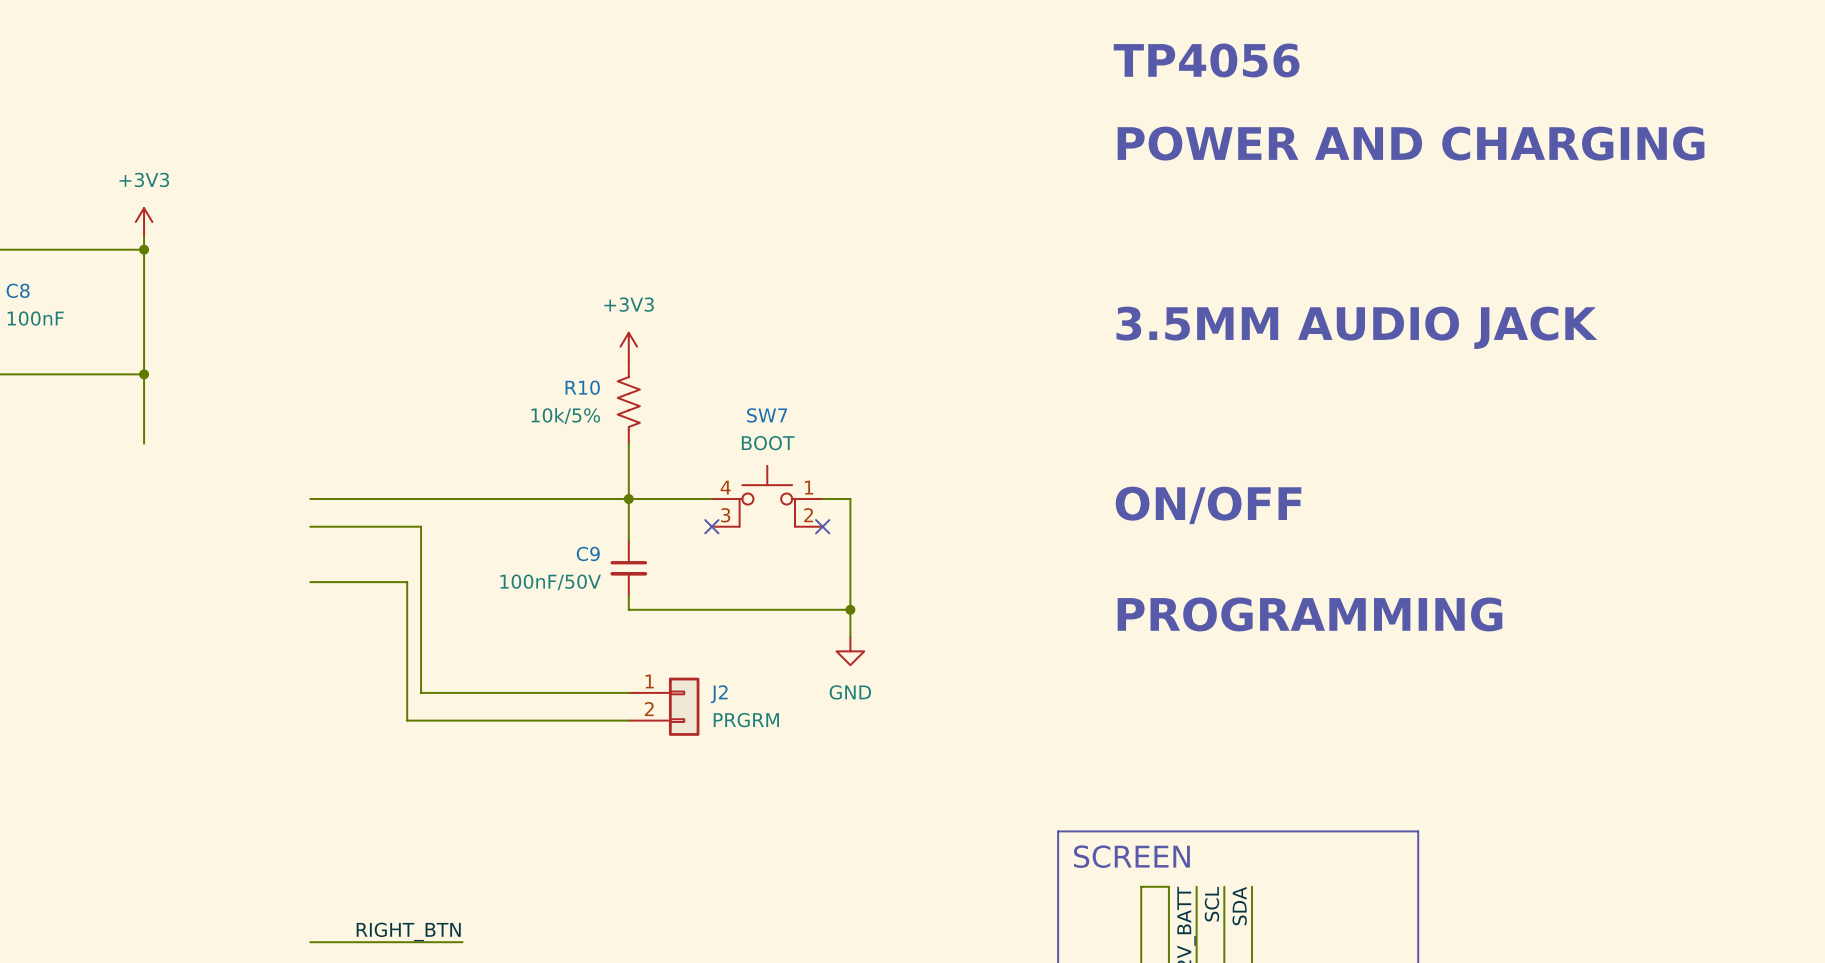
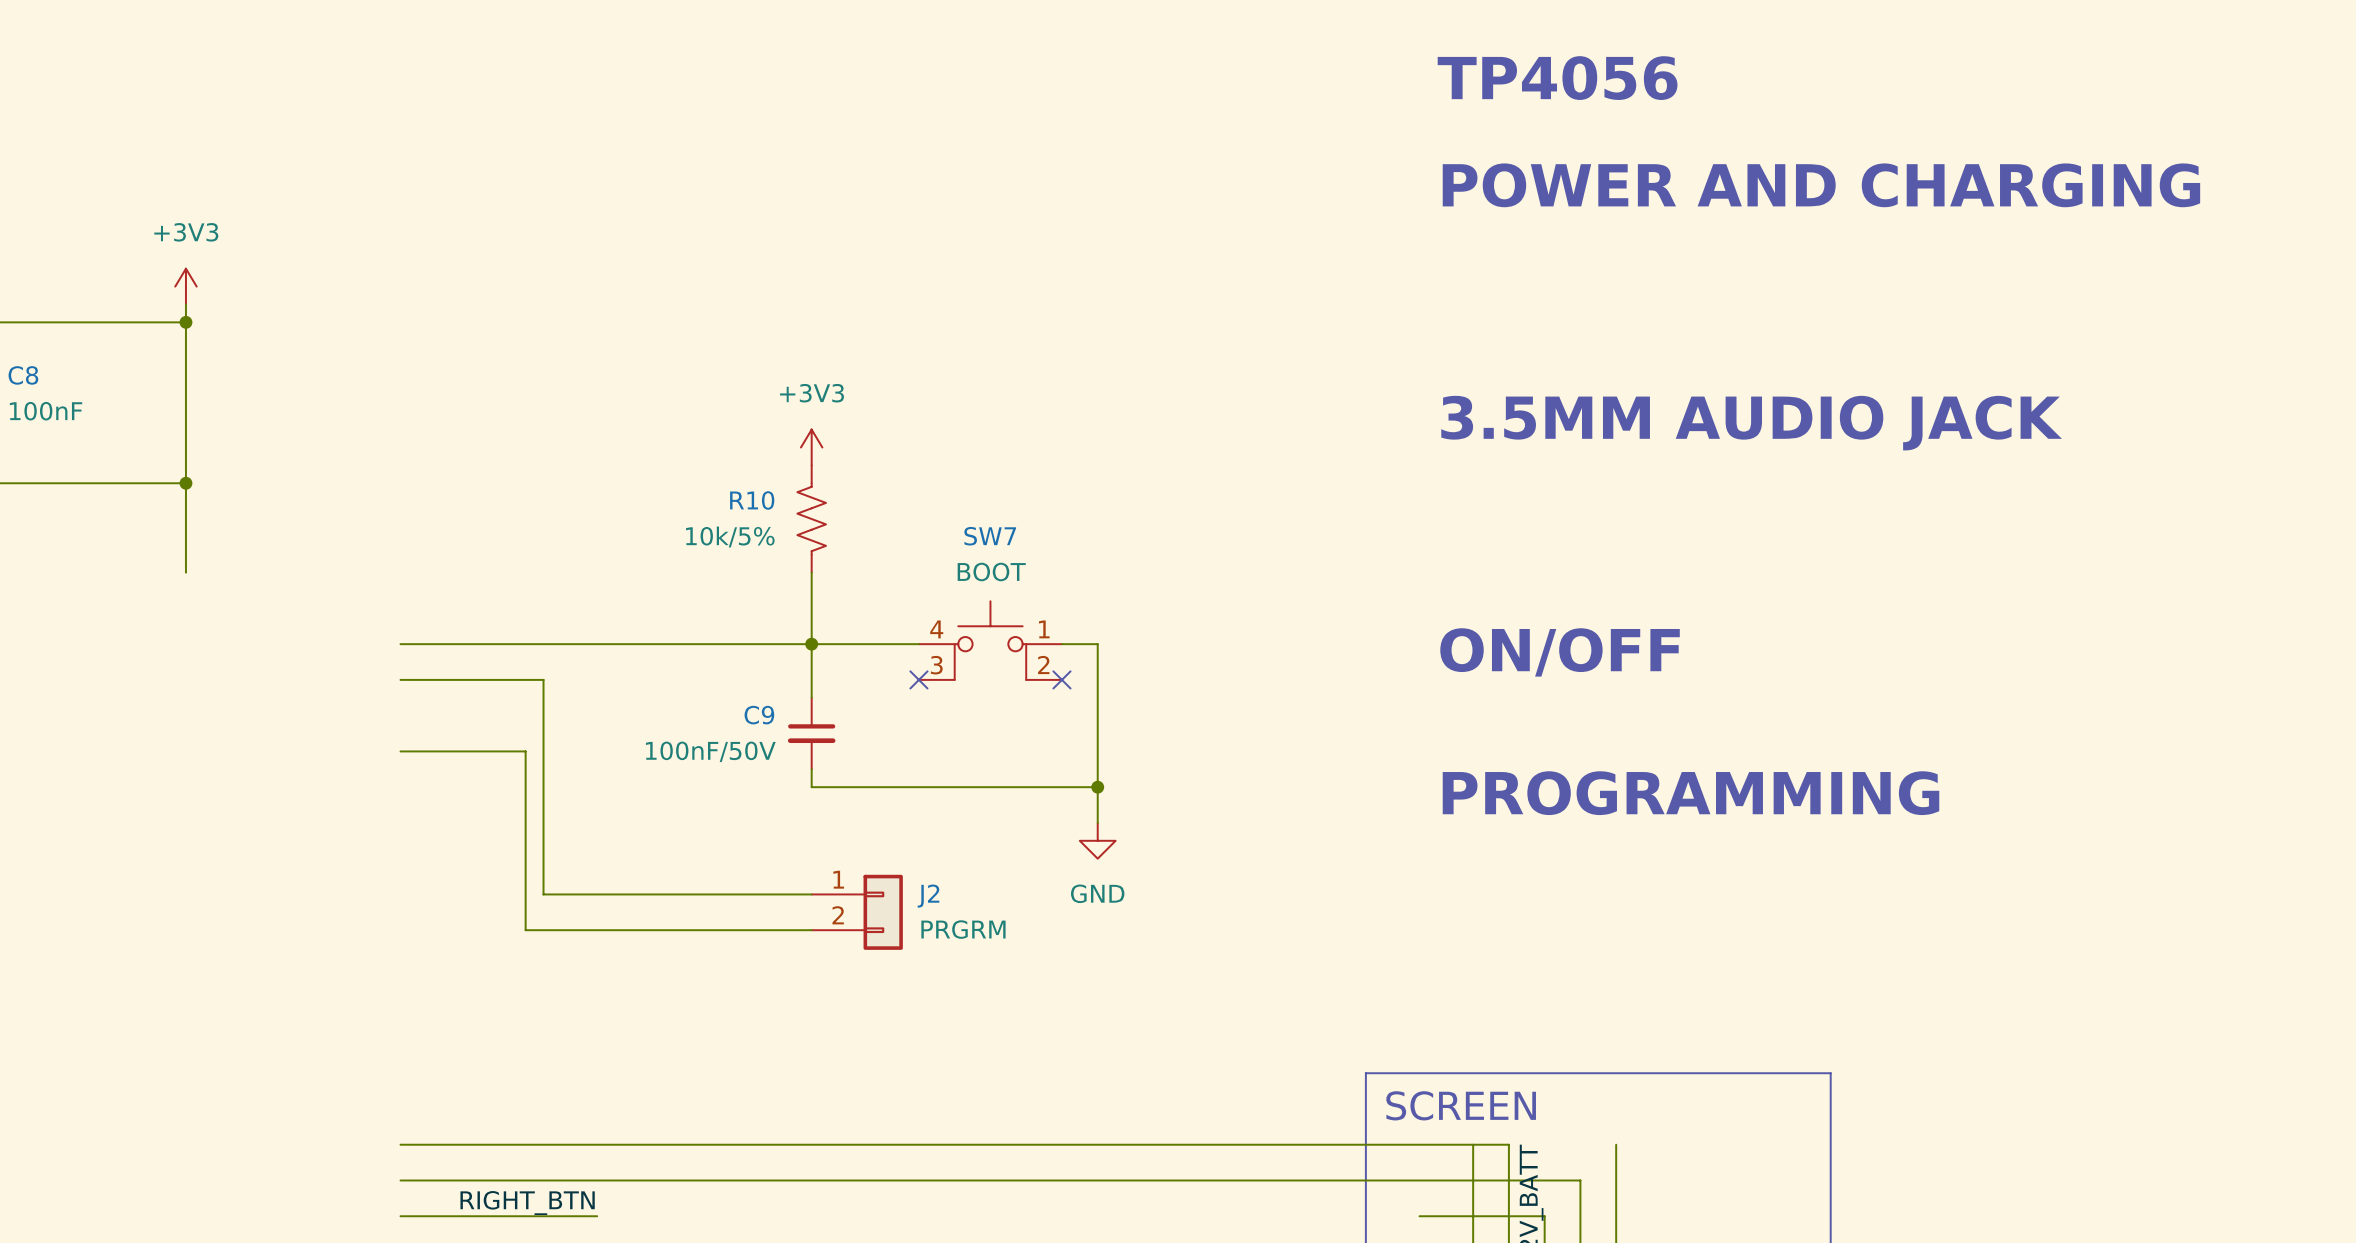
wire: none -> (400, 1144) (1473, 1144)
wire: (1196, 886) (1196, 942) -> (1419, 1216) (1544, 1216)
wire: (1224, 886) (1224, 914) -> (400, 1180) (1580, 1180)
label: SCL (1211, 904) -> none
label: SDA (1239, 906) -> none

